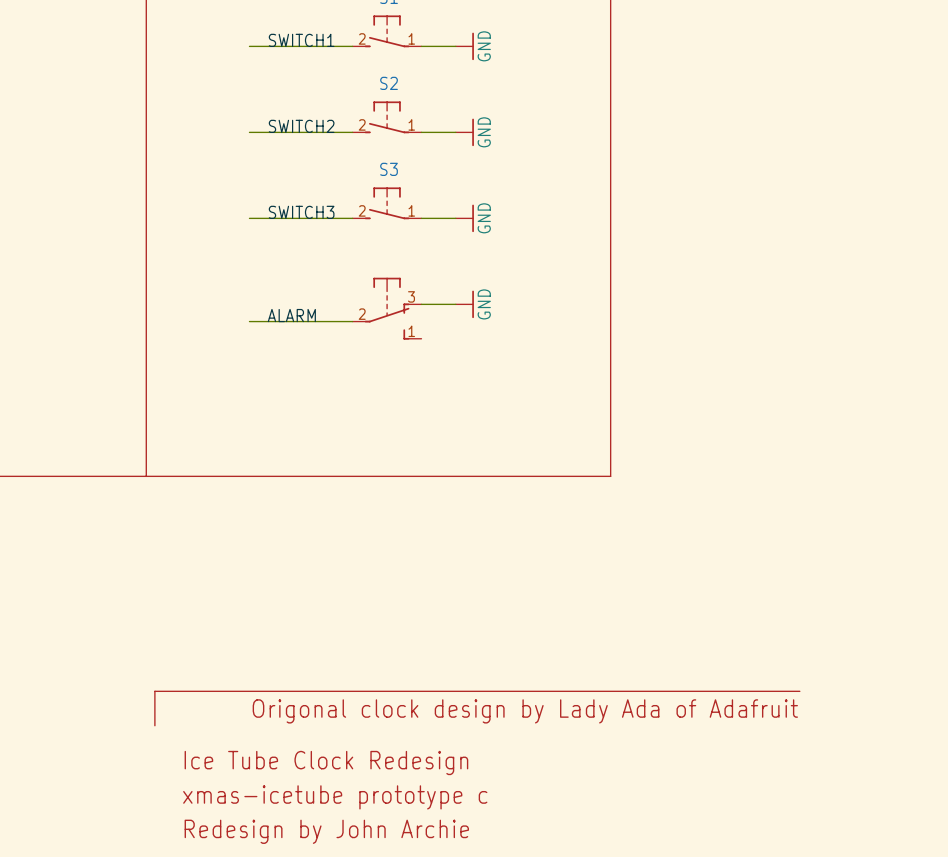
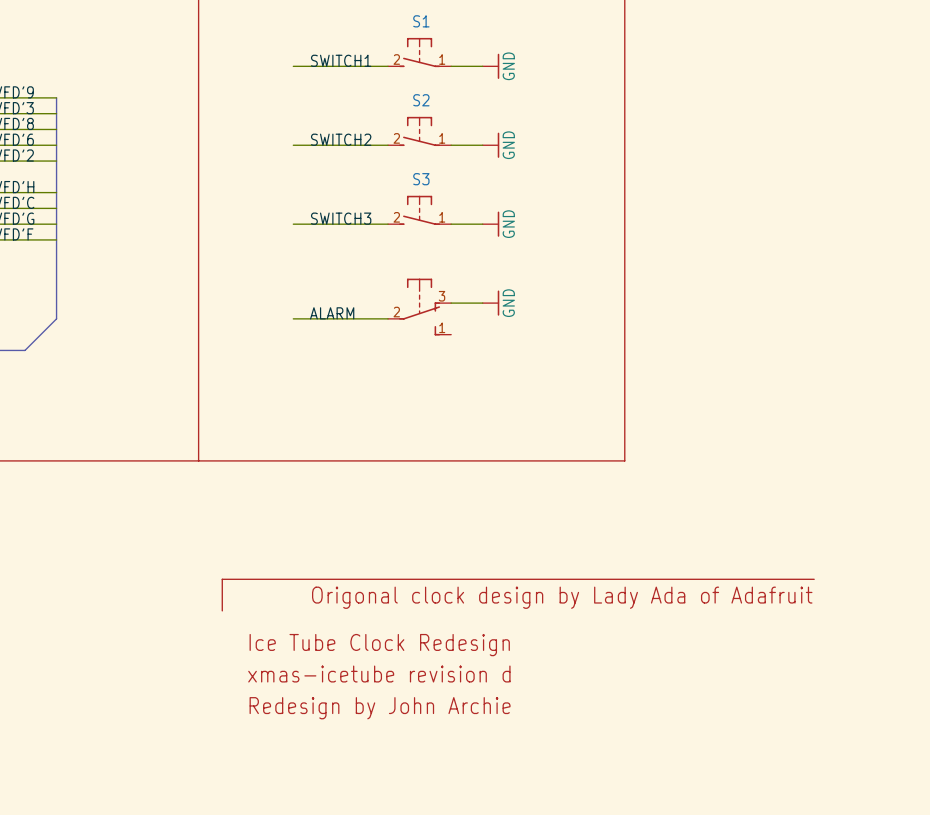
line: (799, 691) (154, 691) (154, 725) -> (814, 579) (222, 579) (222, 610)
text: none -> xmas-icetube revision d (379, 674)
text position: Origonal clock design by Lady Ada of Adafruit (525, 711) -> Origonal clock design by Lady Ada of Adafruit (562, 597)
text position: Ice Tube Clock Redesign (326, 762) -> Ice Tube Clock Redesign (379, 645)
text: xmas-icetube prototype c (335, 797) -> none
text position: Redesign by John Archie (326, 831) -> Redesign by John Archie (380, 708)

